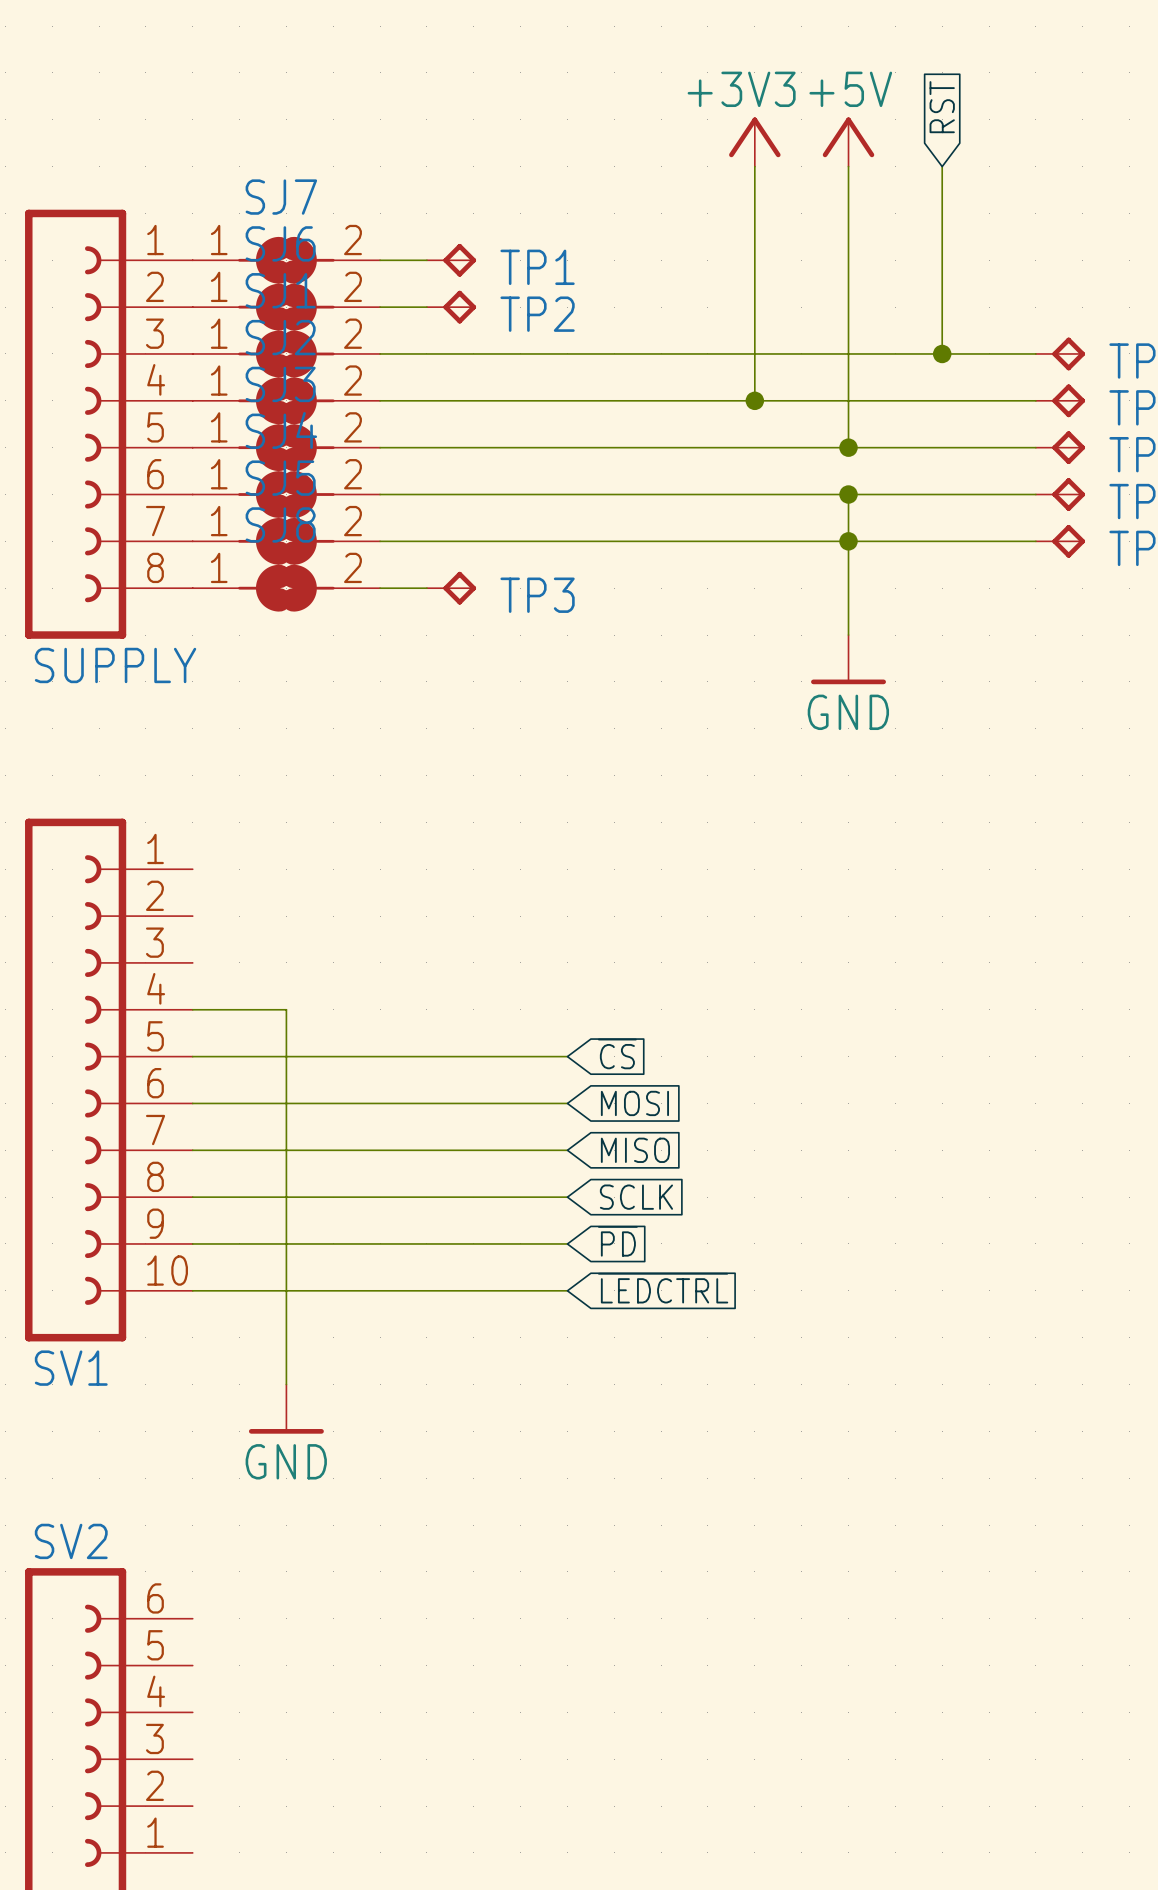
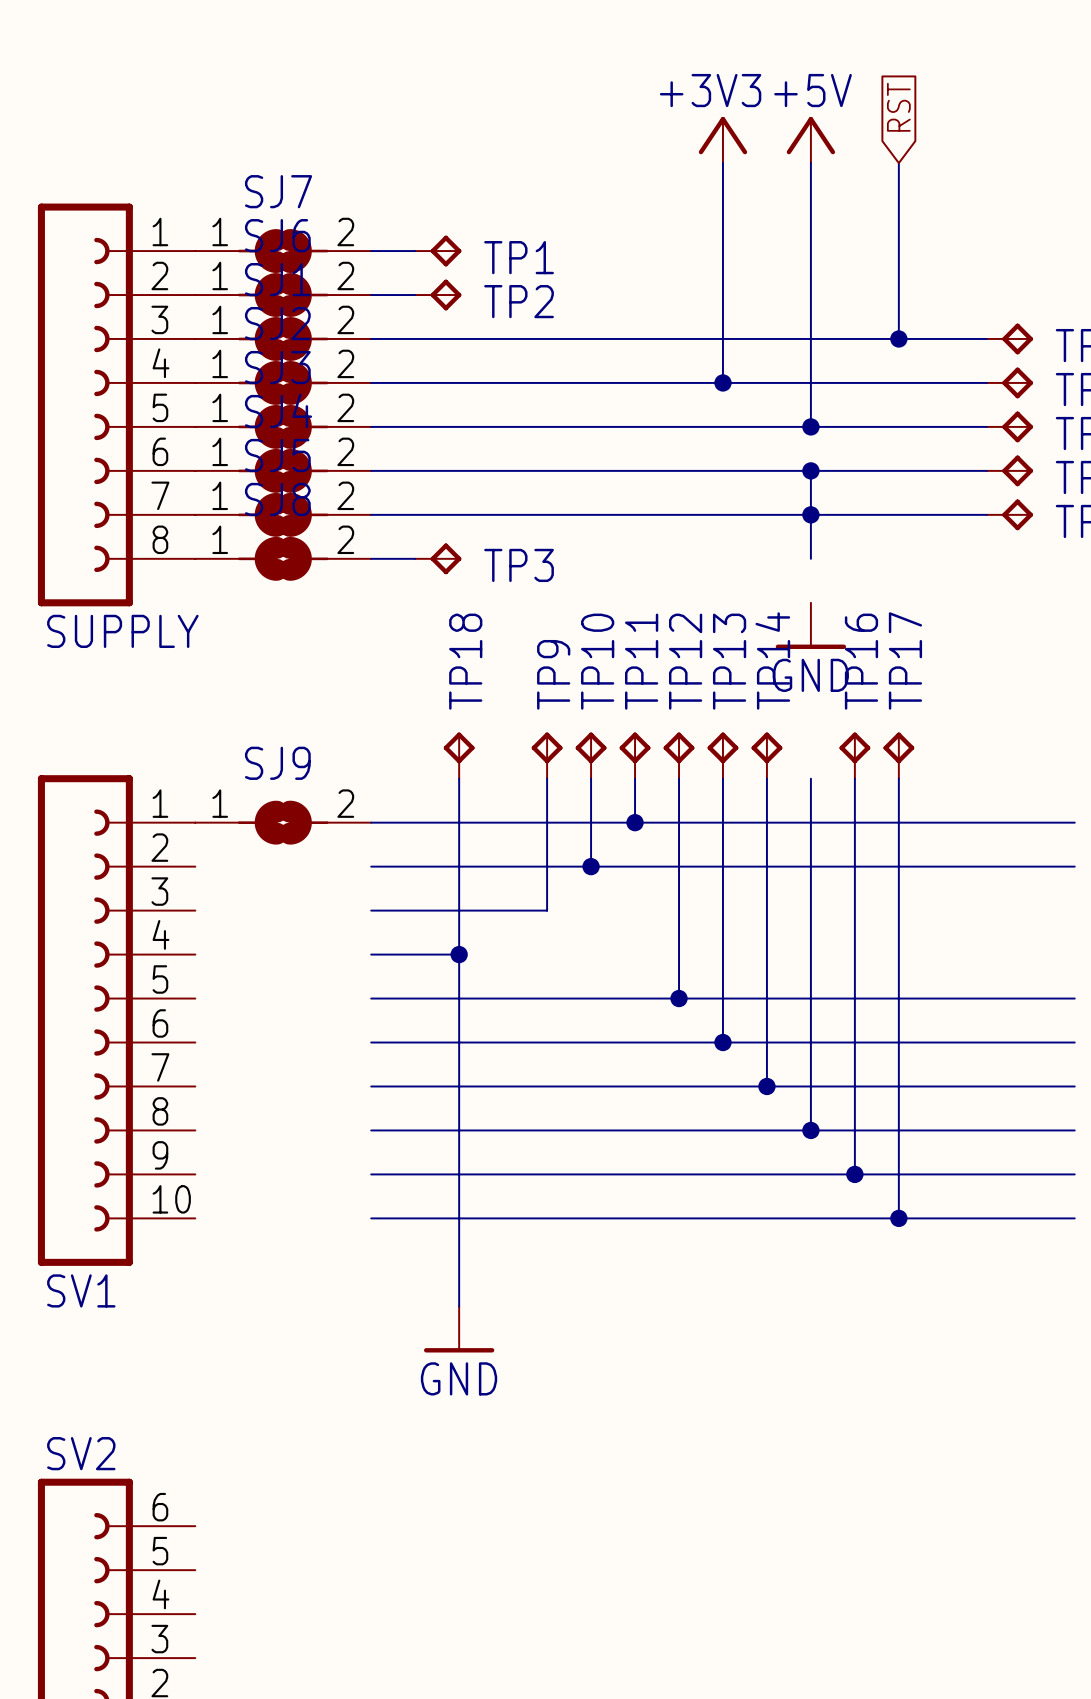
wire: (848, 588) (848, 635) -> (635, 778) (635, 822)
TP18: none -> (459, 755)
TP9: none -> (547, 755)
TP10: none -> (591, 755)
TP11: none -> (635, 755)
TP12: none -> (679, 755)
TP13: none -> (722, 755)
TP14: none -> (766, 755)
TP16: none -> (854, 755)
TP17: none -> (898, 755)
wire: none -> (459, 778) (459, 1306)
wire: none -> (547, 778) (547, 910) (371, 910)
wire: none -> (591, 778) (591, 866)
wire: none -> (679, 778) (679, 998)
wire: none -> (722, 778) (722, 1042)
wire: none -> (766, 778) (766, 1086)
wire: none -> (810, 778) (810, 1130)
wire: none -> (854, 778) (854, 1174)
wire: none -> (898, 778) (898, 1218)
SJ9: none -> (283, 822)
wire: none -> (371, 822) (1074, 822)
junction: none -> (635, 822)
wire: none -> (371, 866) (1074, 866)
junction: none -> (591, 866)
wire: (192, 1009) (286, 1009) (286, 1384) -> none
wire: none -> (371, 954) (459, 954)
junction: none -> (459, 954)
global label: ~{CS} (617, 1053) -> none
wire: (192, 1056) (380, 1056) -> none
wire: none -> (547, 998) (1074, 998)
junction: none -> (679, 998)
wire: (192, 1103) (380, 1103) -> none
wire: none -> (547, 1042) (1074, 1042)
global label: MOSI (634, 1103) -> none
junction: none -> (722, 1042)
wire: (192, 1150) (380, 1150) -> none
wire: none -> (547, 1086) (1074, 1086)
global label: MISO (635, 1150) -> none
junction: none -> (766, 1086)
wire: (192, 1197) (380, 1197) -> none
wire: none -> (547, 1130) (1074, 1130)
global label: SCLK (636, 1197) -> none
junction: none -> (810, 1130)
global label: ~{PD} (617, 1241) -> none
wire: (192, 1243) (380, 1243) -> none
wire: none -> (547, 1174) (1074, 1174)
junction: none -> (854, 1174)
global label: ~{LEDCTRL} (663, 1288) -> none
wire: (192, 1290) (380, 1290) -> none
wire: none -> (547, 1218) (1074, 1218)
junction: none -> (898, 1218)
power symbol position: GND (286, 1409) -> GND (459, 1329)

